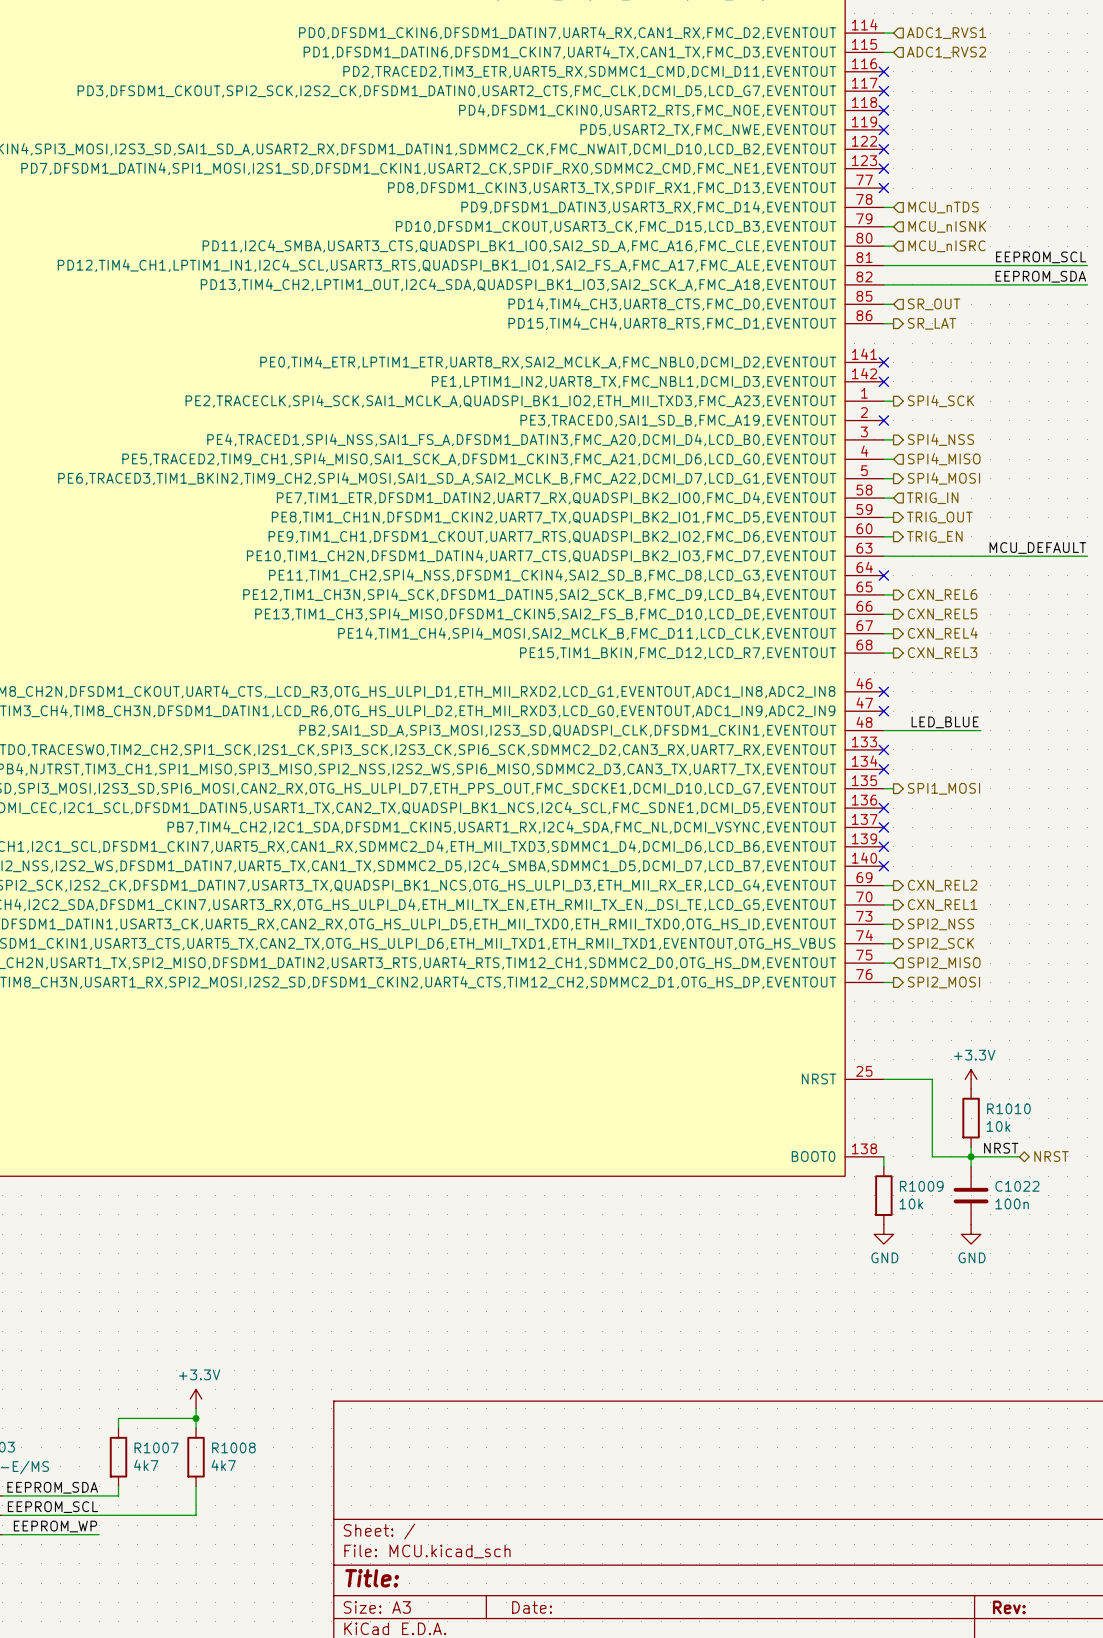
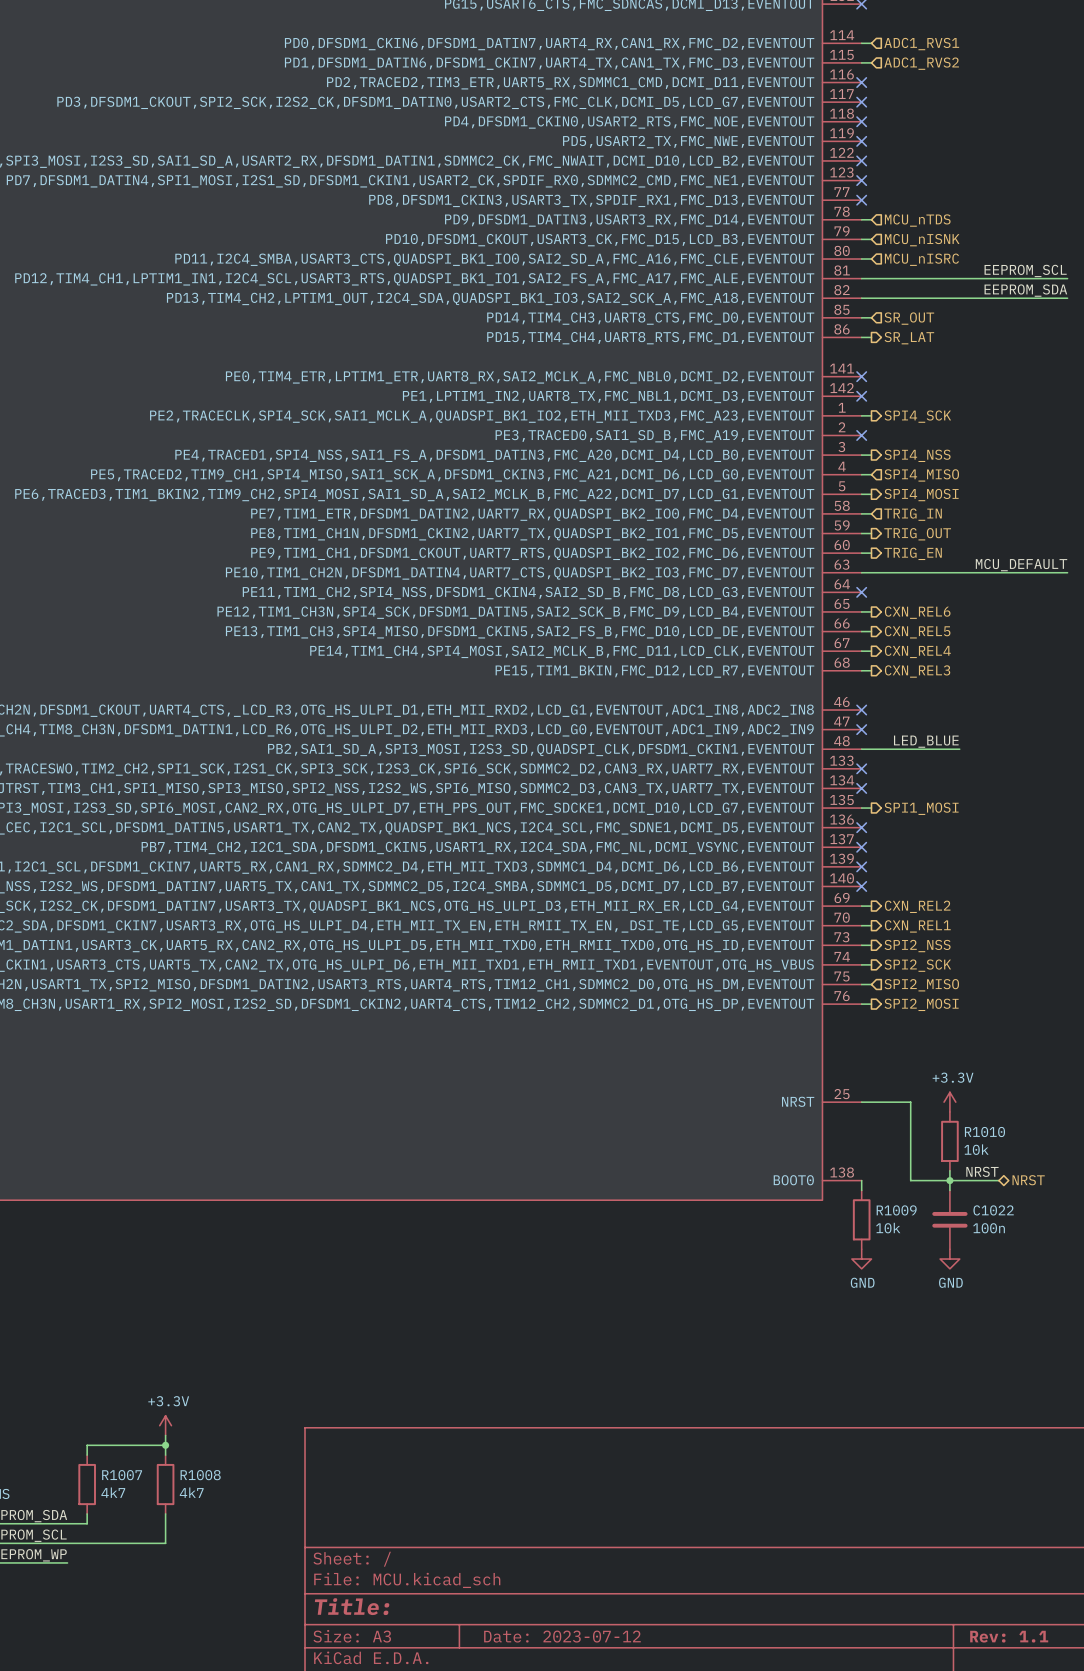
title block: Date: (532, 1607) -> Date: 2023-07-12 (562, 1636)
title block: Rev: (1009, 1607) -> Rev: 1.1 (1009, 1636)

